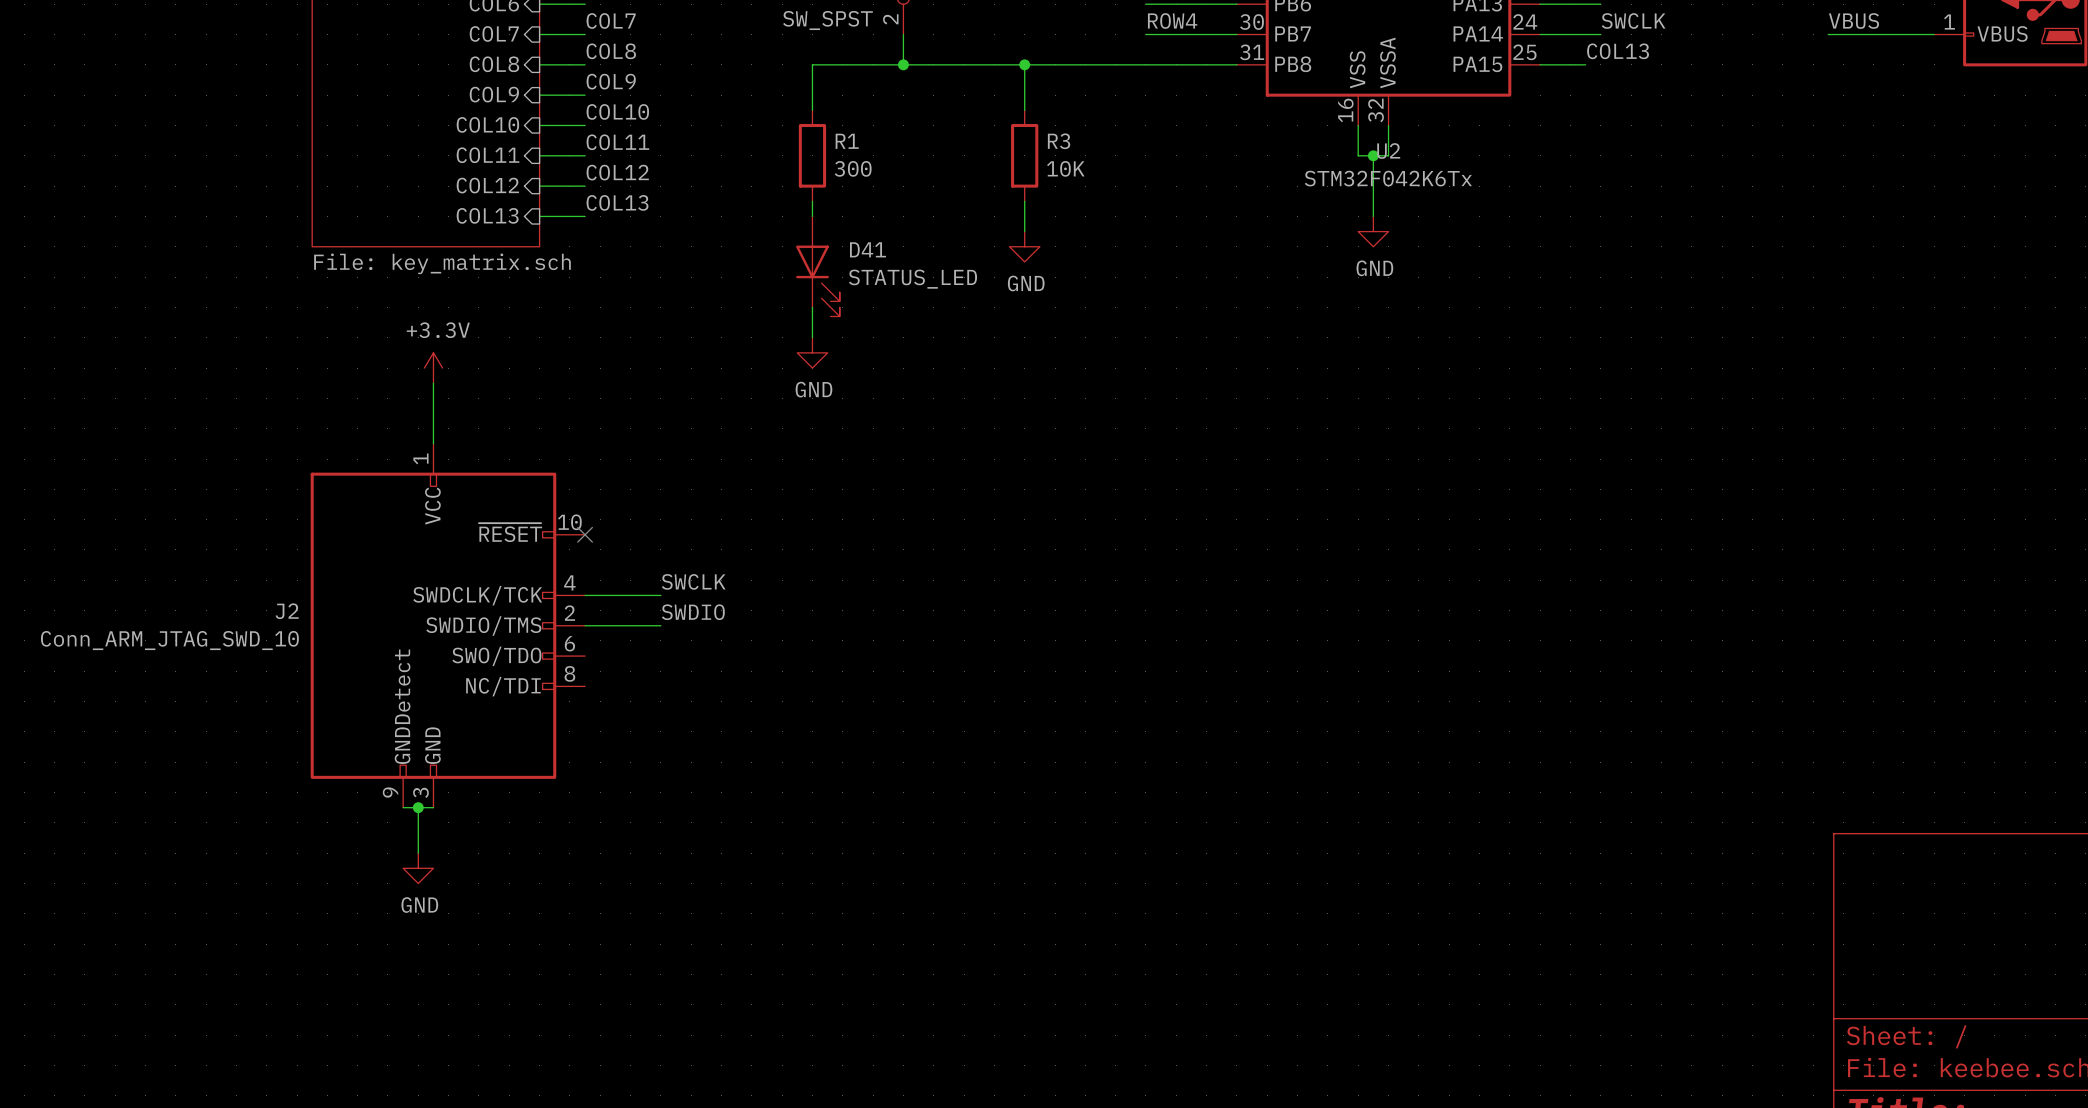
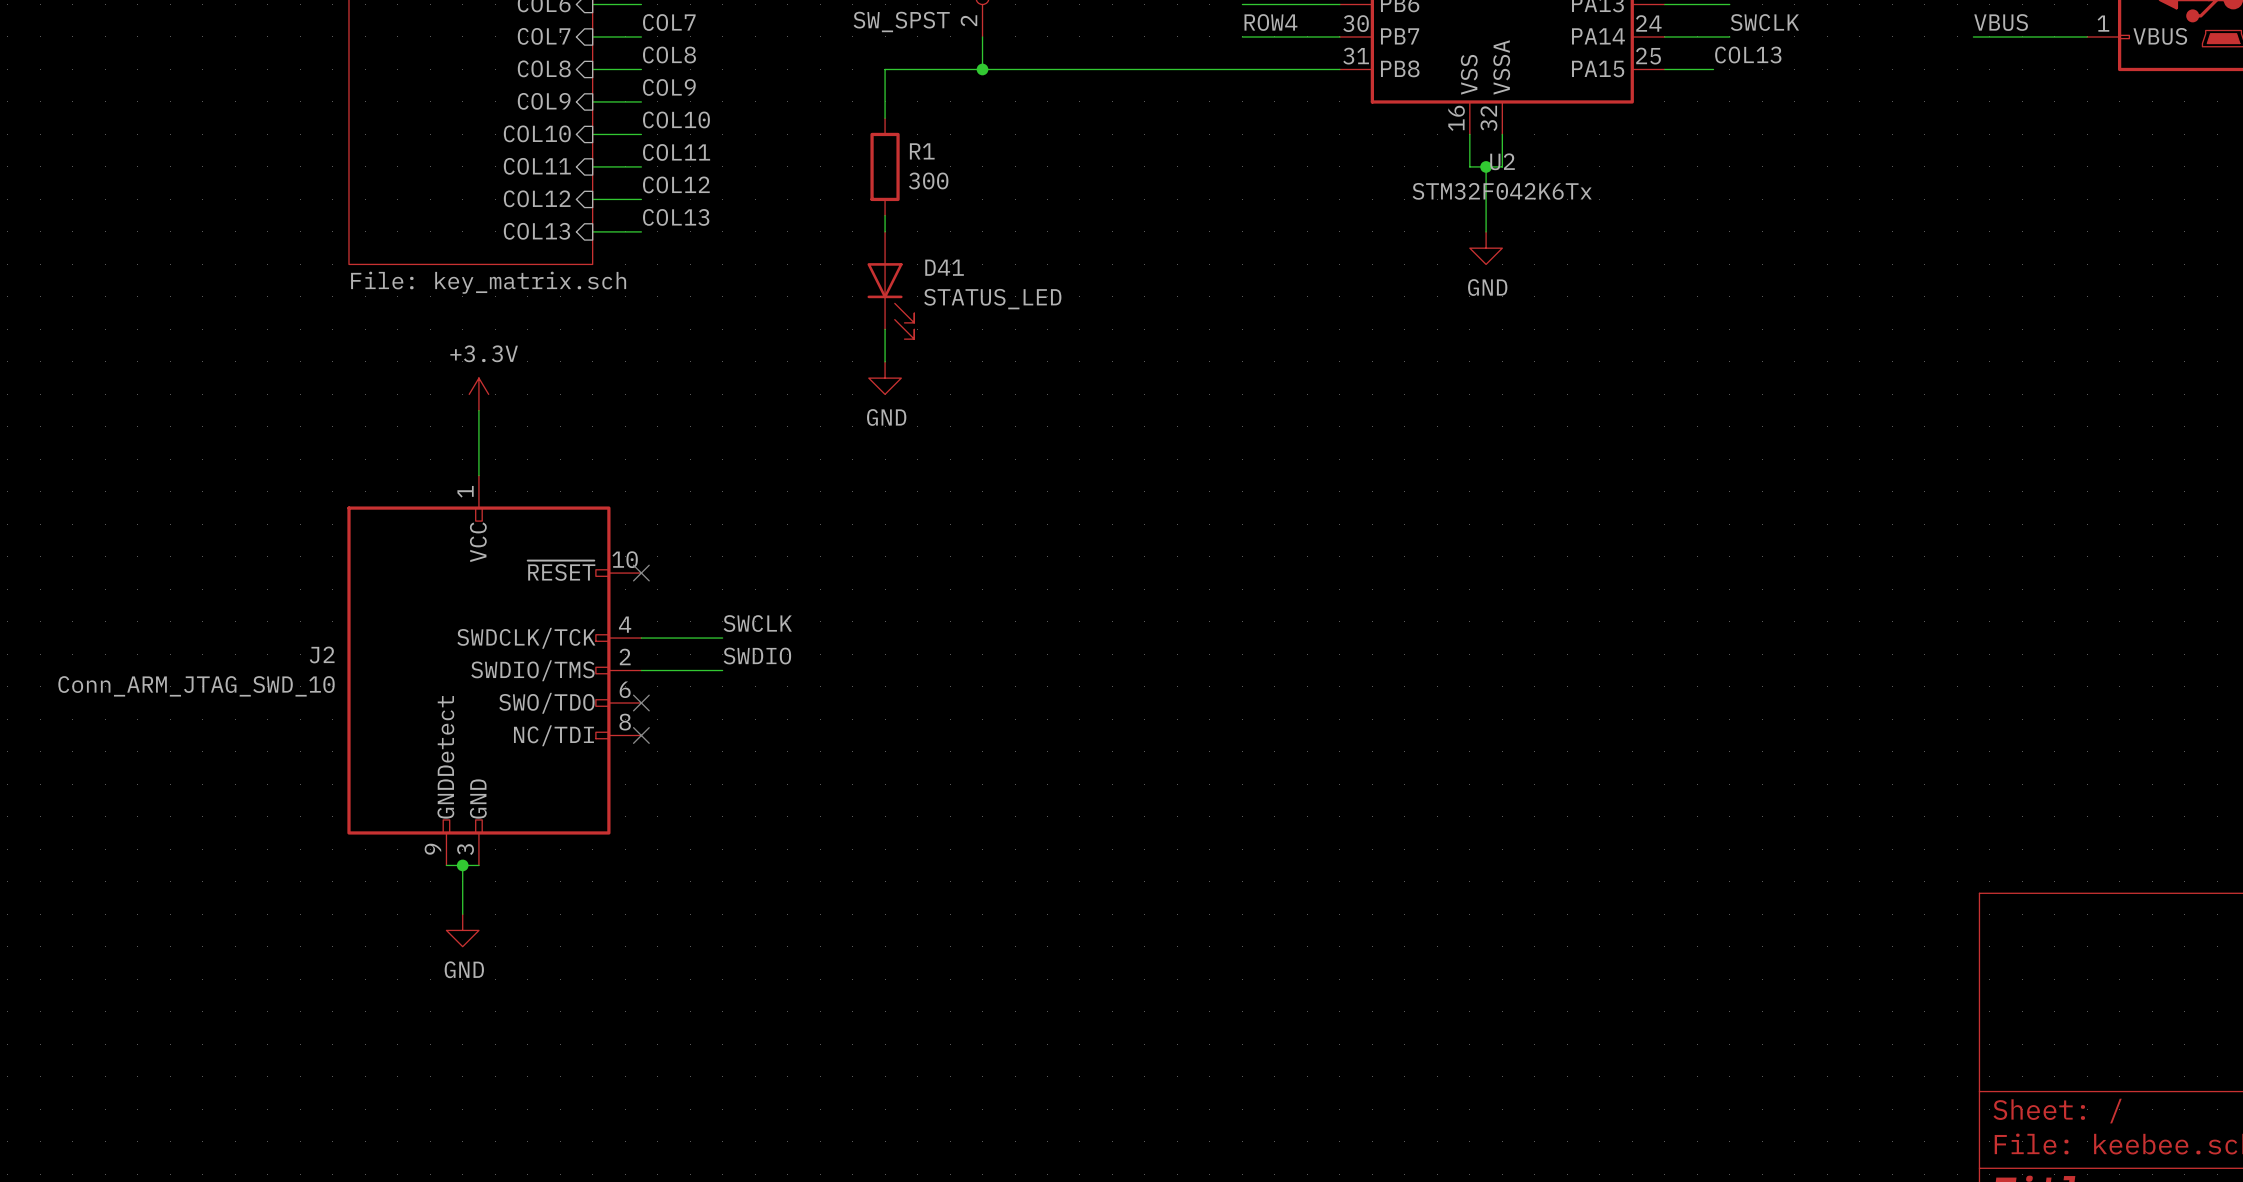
wire: (1024, 64) (1024, 110) -> none
junction: (1024, 64) -> none
R3: 10K (1024, 155) -> none
wire: (1024, 201) (1024, 231) -> none
power symbol: GND (1024, 246) -> none
no-connect mark: none -> (641, 703)
no-connect mark: none -> (641, 735)

